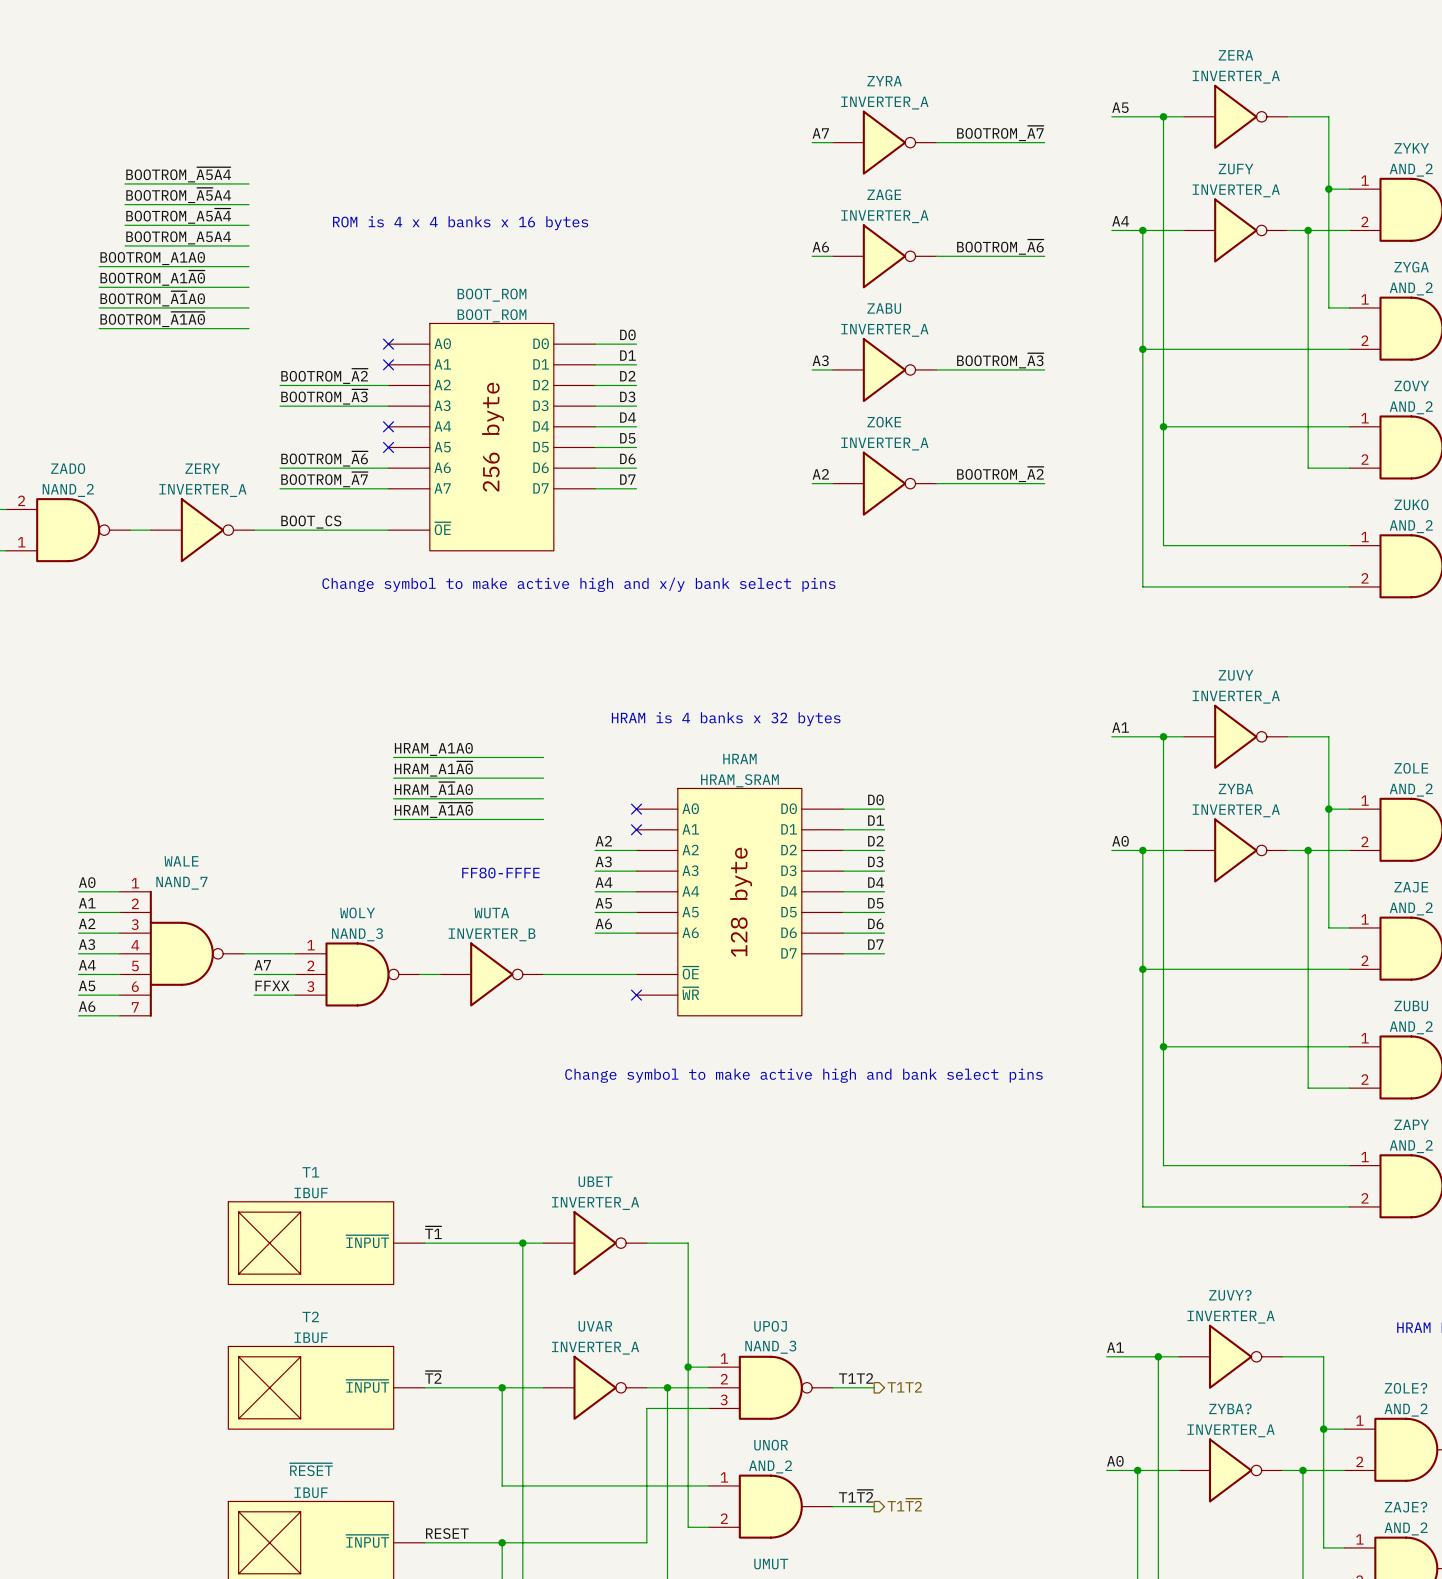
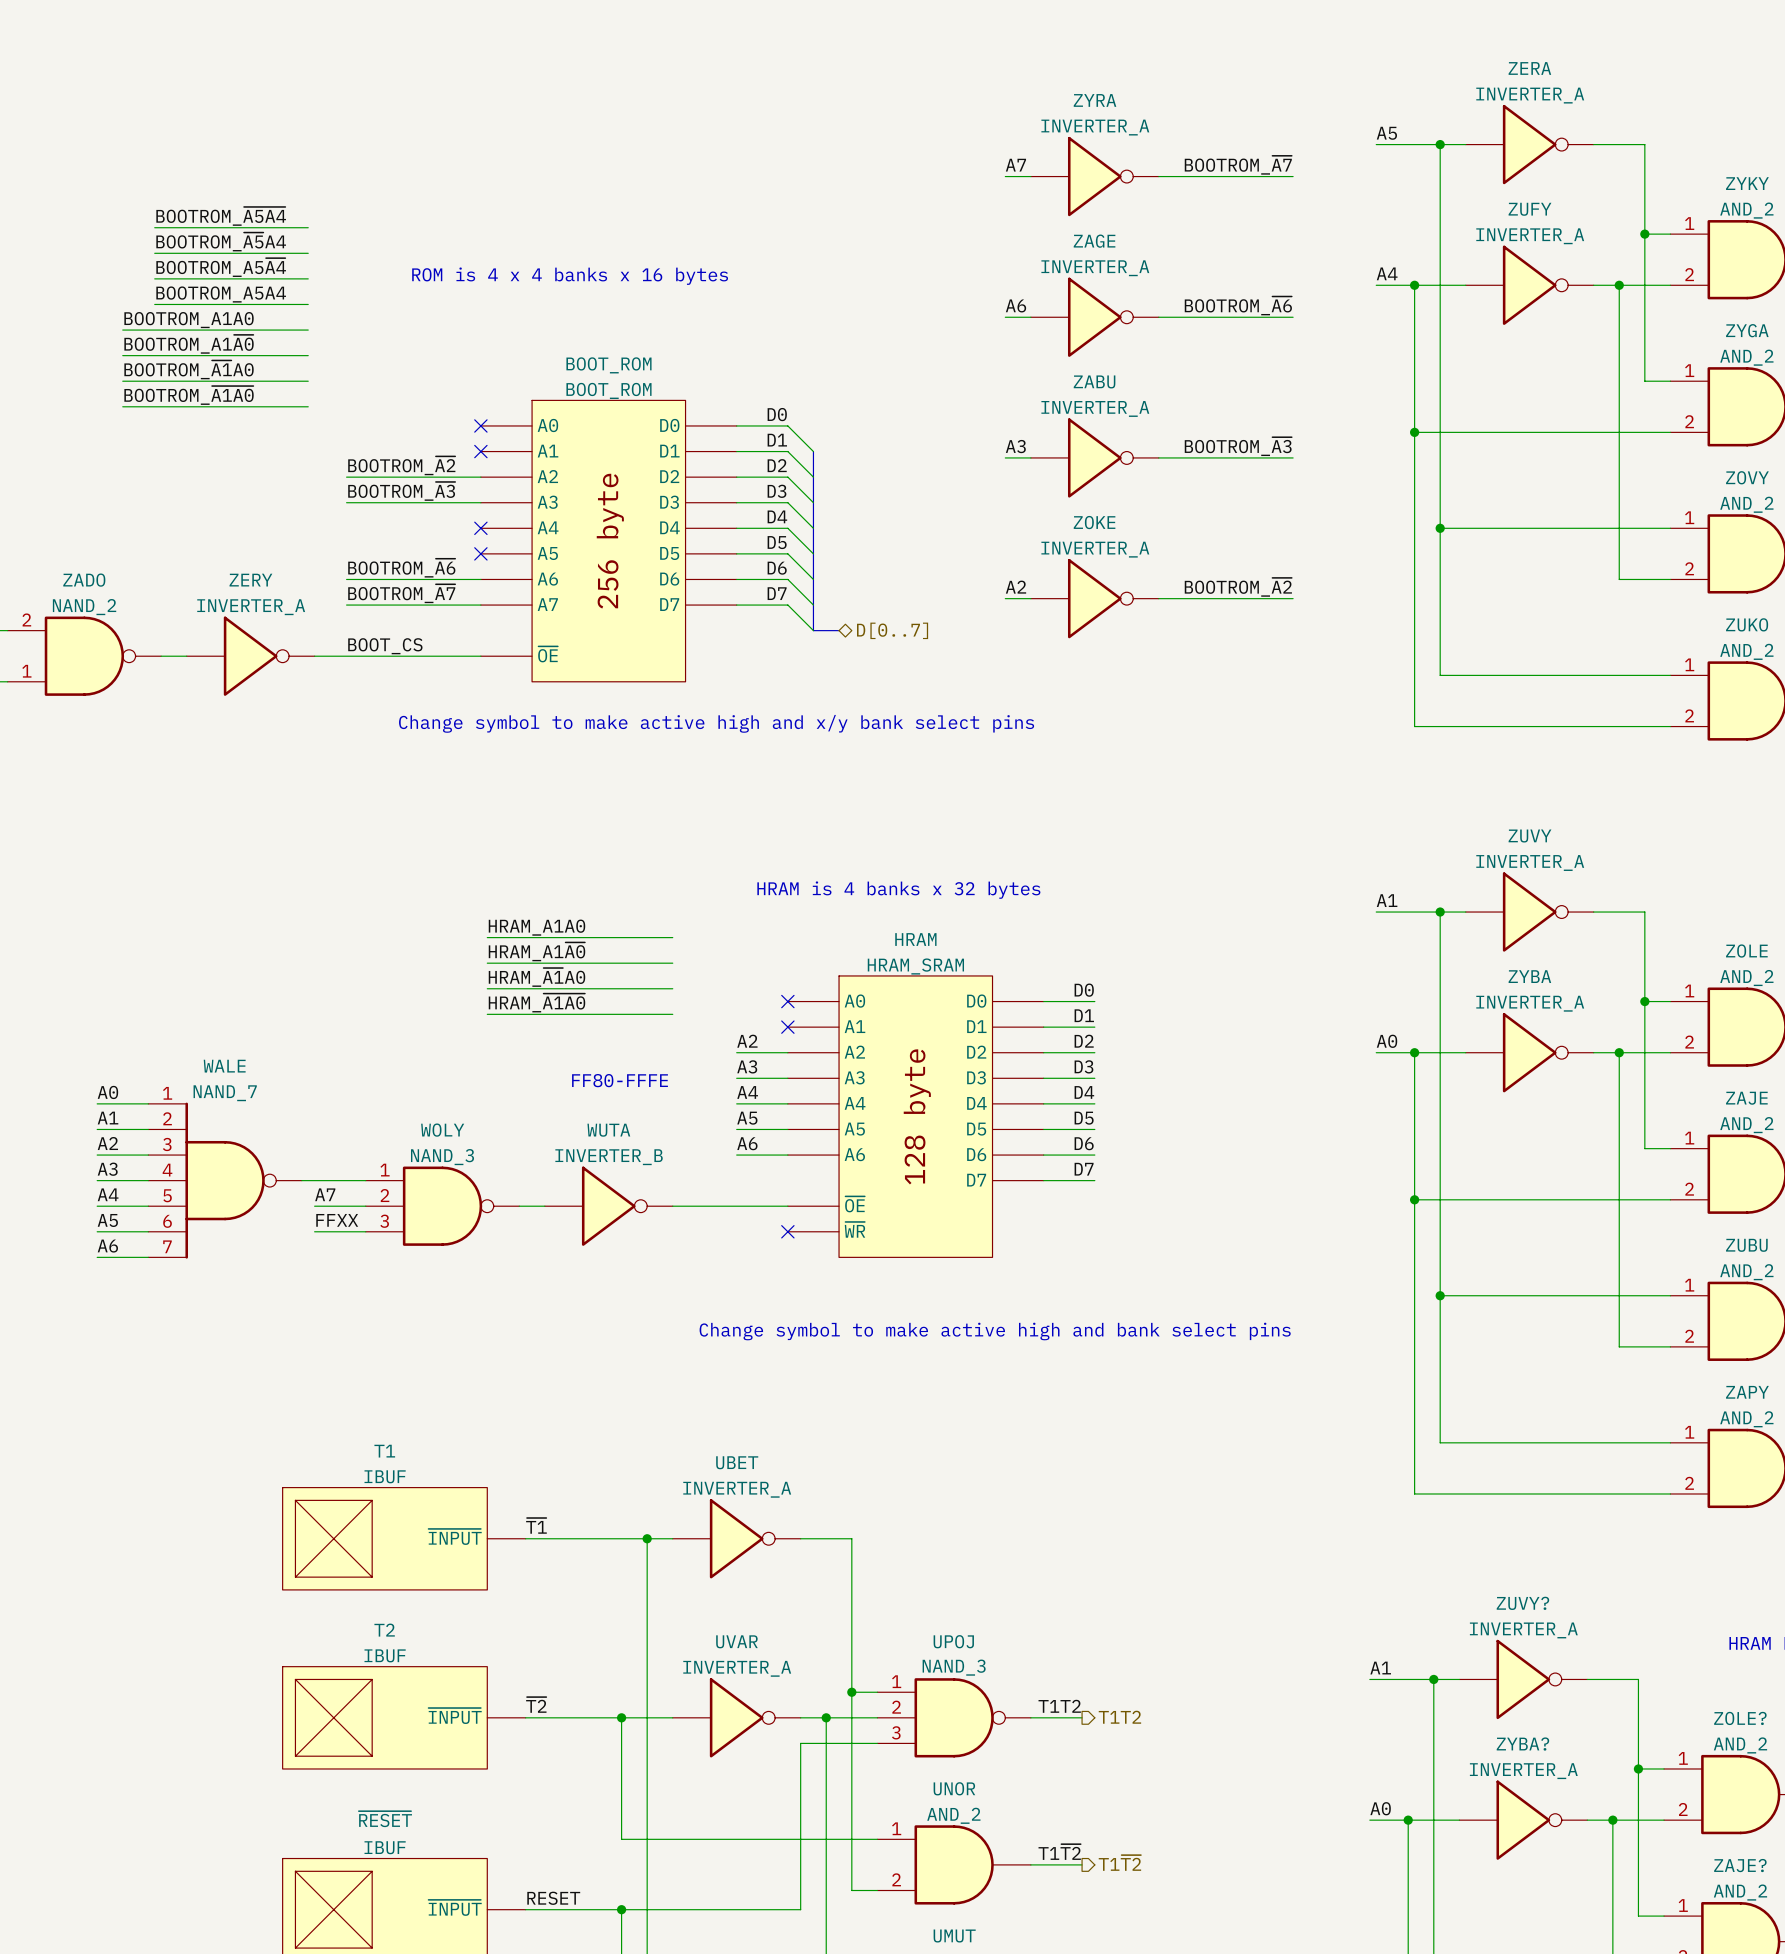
wire: none -> (787, 425) (813, 451)
wire: none -> (787, 451) (813, 477)
bus: none -> (813, 451) (813, 630) (839, 630)
wire: none -> (787, 477) (813, 502)
wire: none -> (787, 502) (813, 528)
wire: none -> (787, 528) (813, 553)
wire: none -> (787, 553) (813, 579)
wire: none -> (787, 579) (813, 605)
wire: none -> (787, 605) (813, 630)
hierarchical label: none -> D[0..7] (892, 630)

